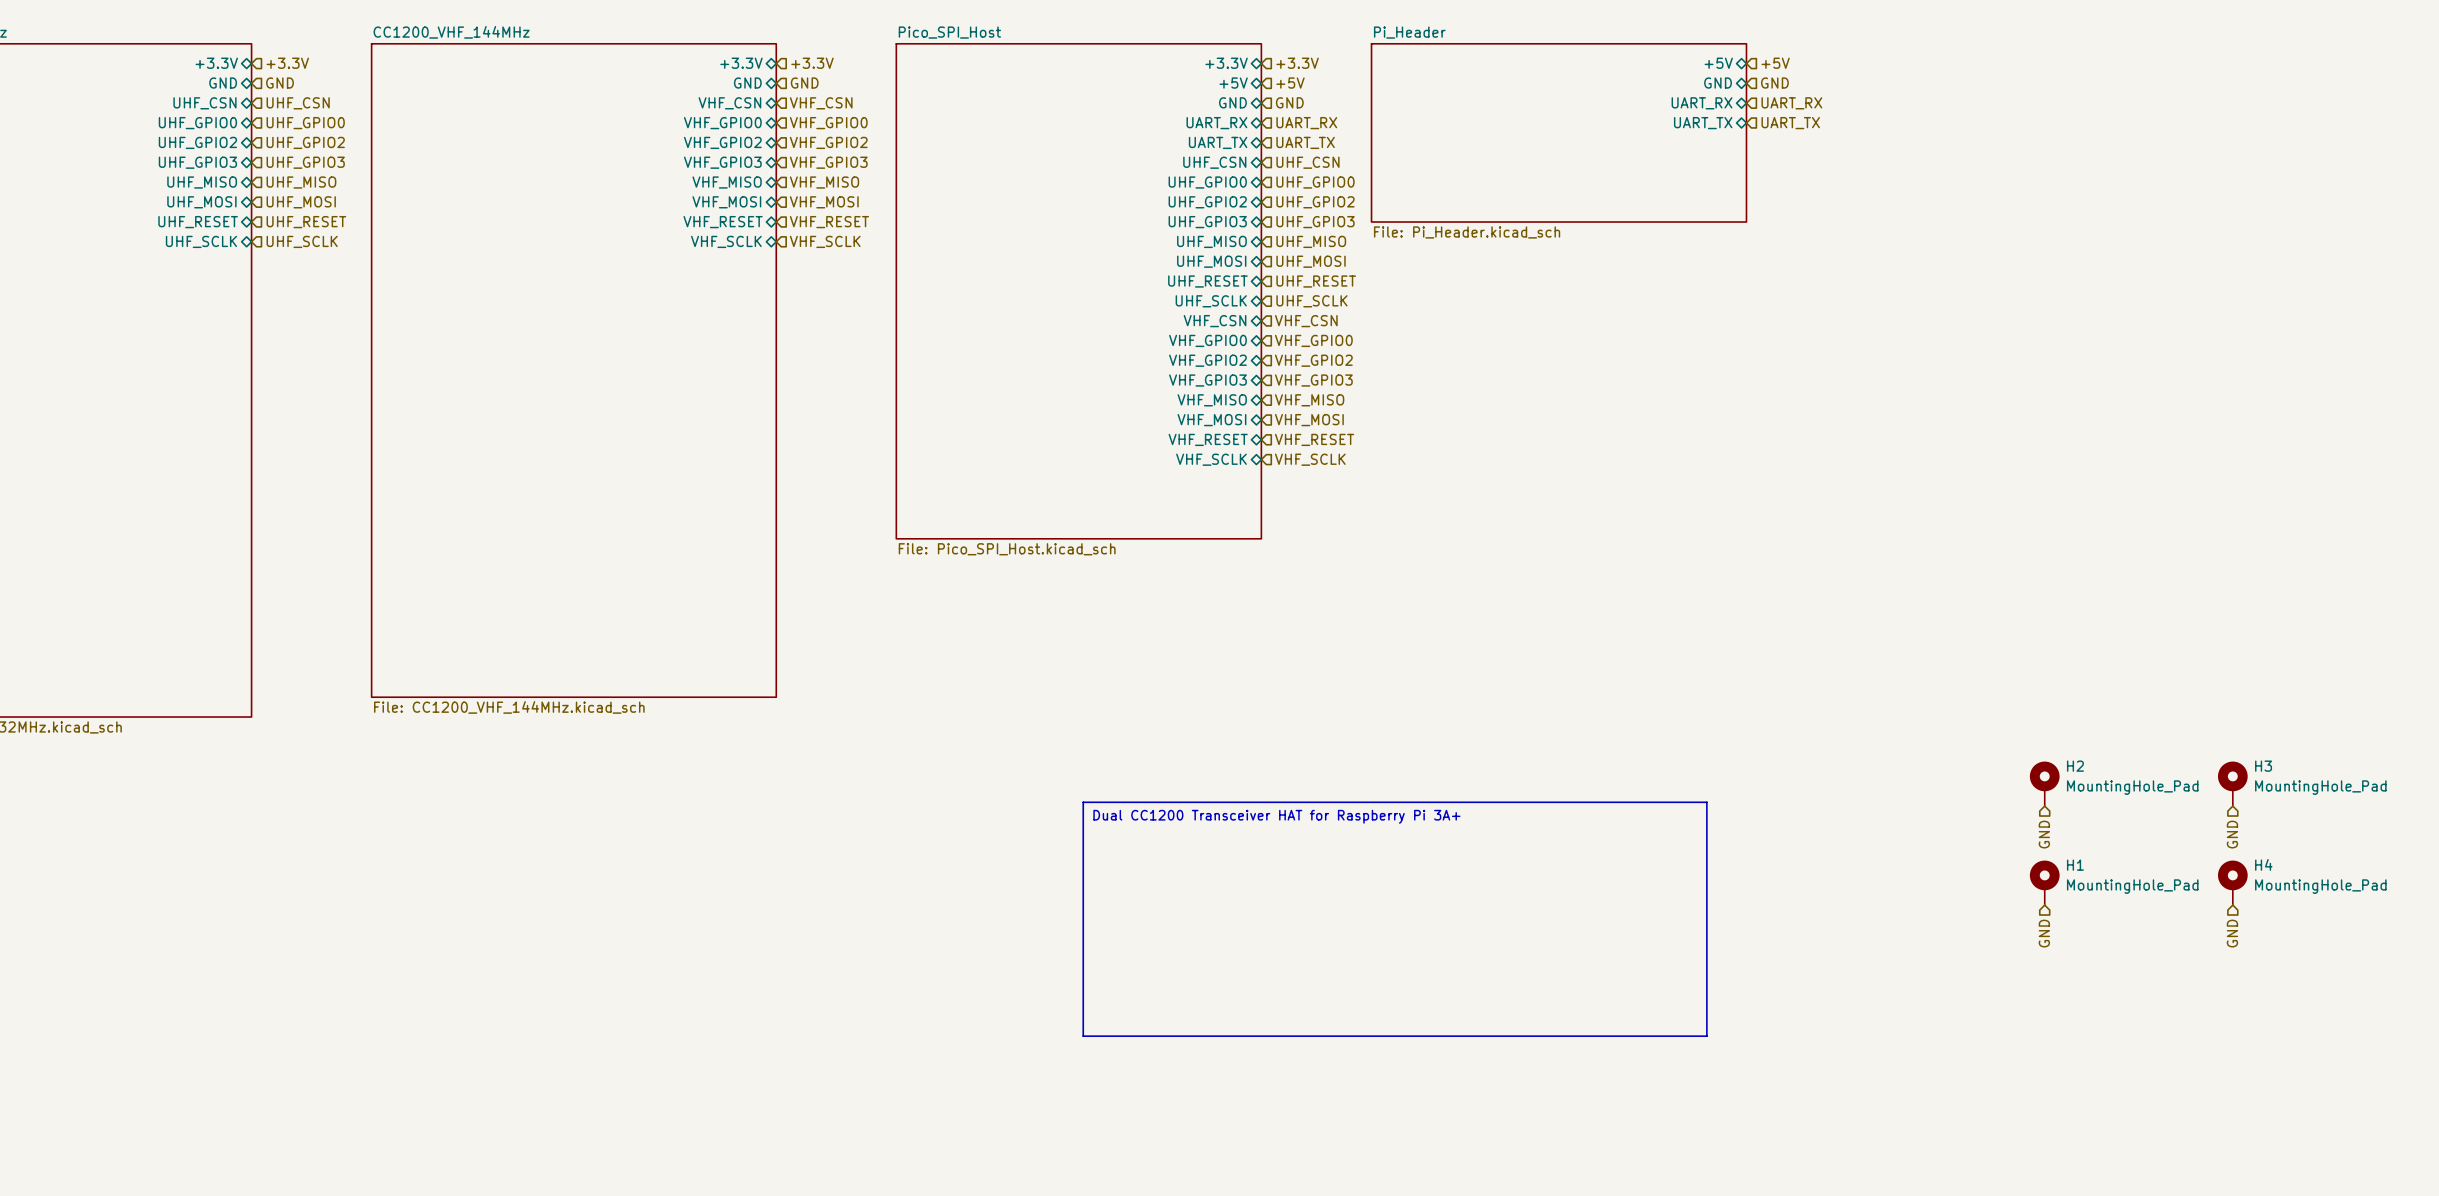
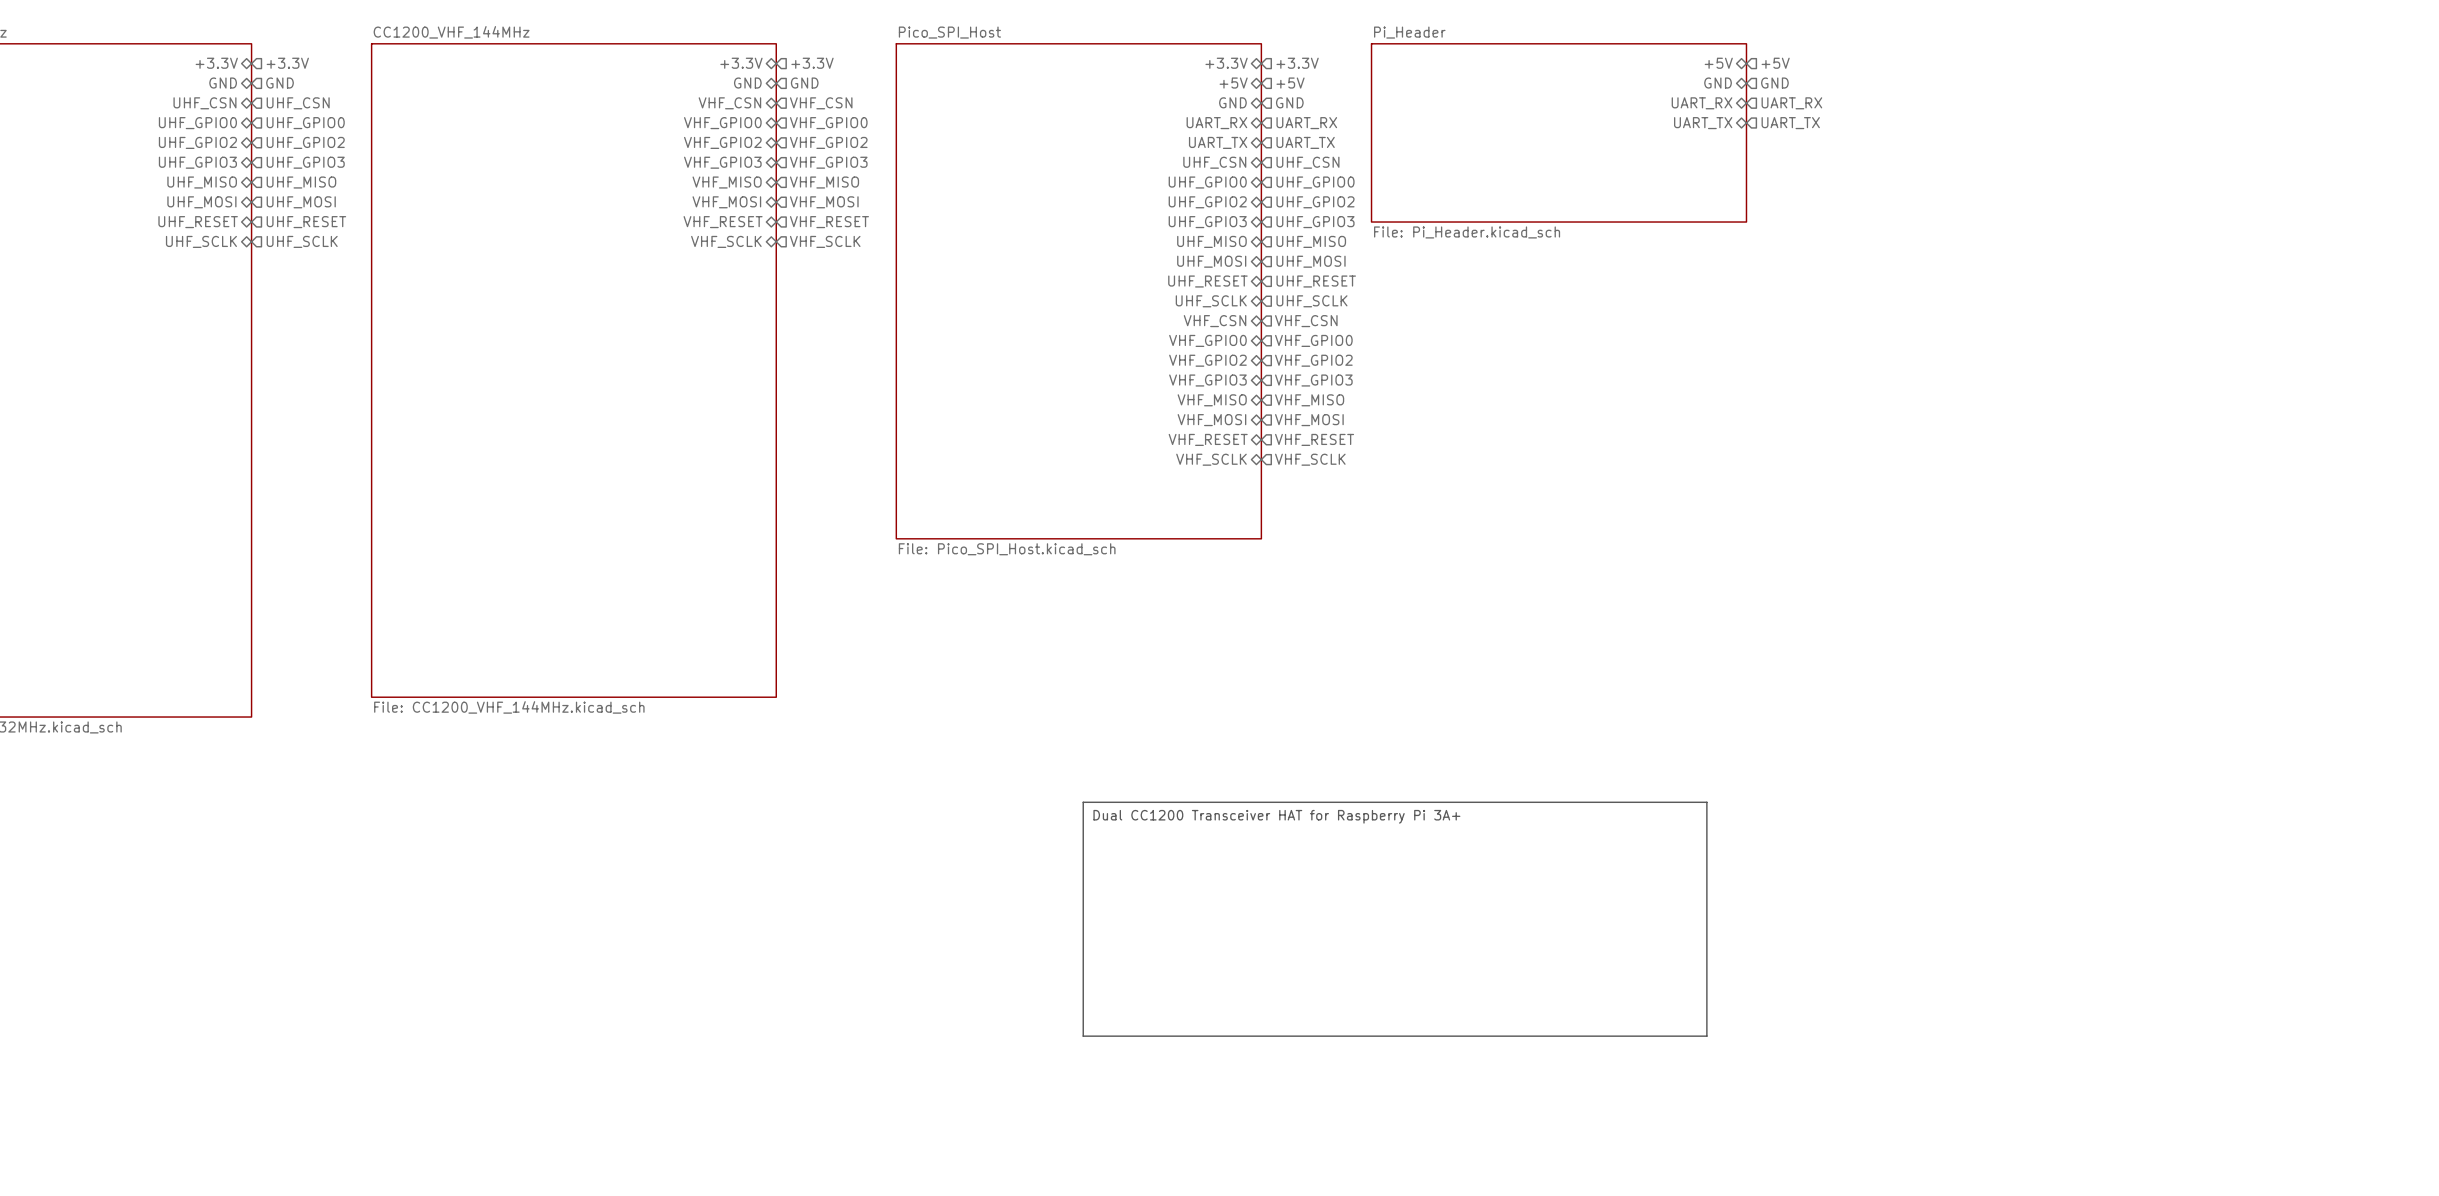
H2: MountingHole_Pad (2044, 783) -> none
H3: MountingHole_Pad (2232, 783) -> none
hierarchical label: GND (2044, 834) -> none
hierarchical label: GND (2232, 834) -> none
H1: MountingHole_Pad (2044, 882) -> none
H4: MountingHole_Pad (2232, 882) -> none
hierarchical label: GND (2044, 933) -> none
hierarchical label: GND (2232, 933) -> none

